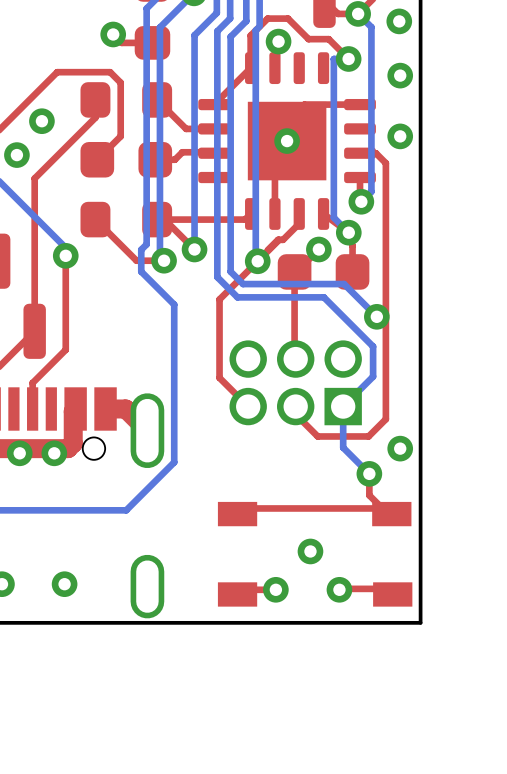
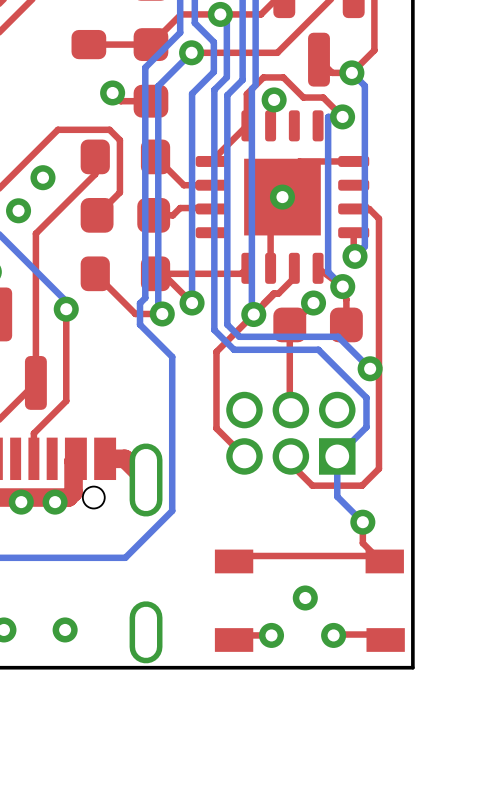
via: (399, 21) -> none
via: (400, 75) -> none
via: (400, 136) -> none
via: (400, 448) -> none

